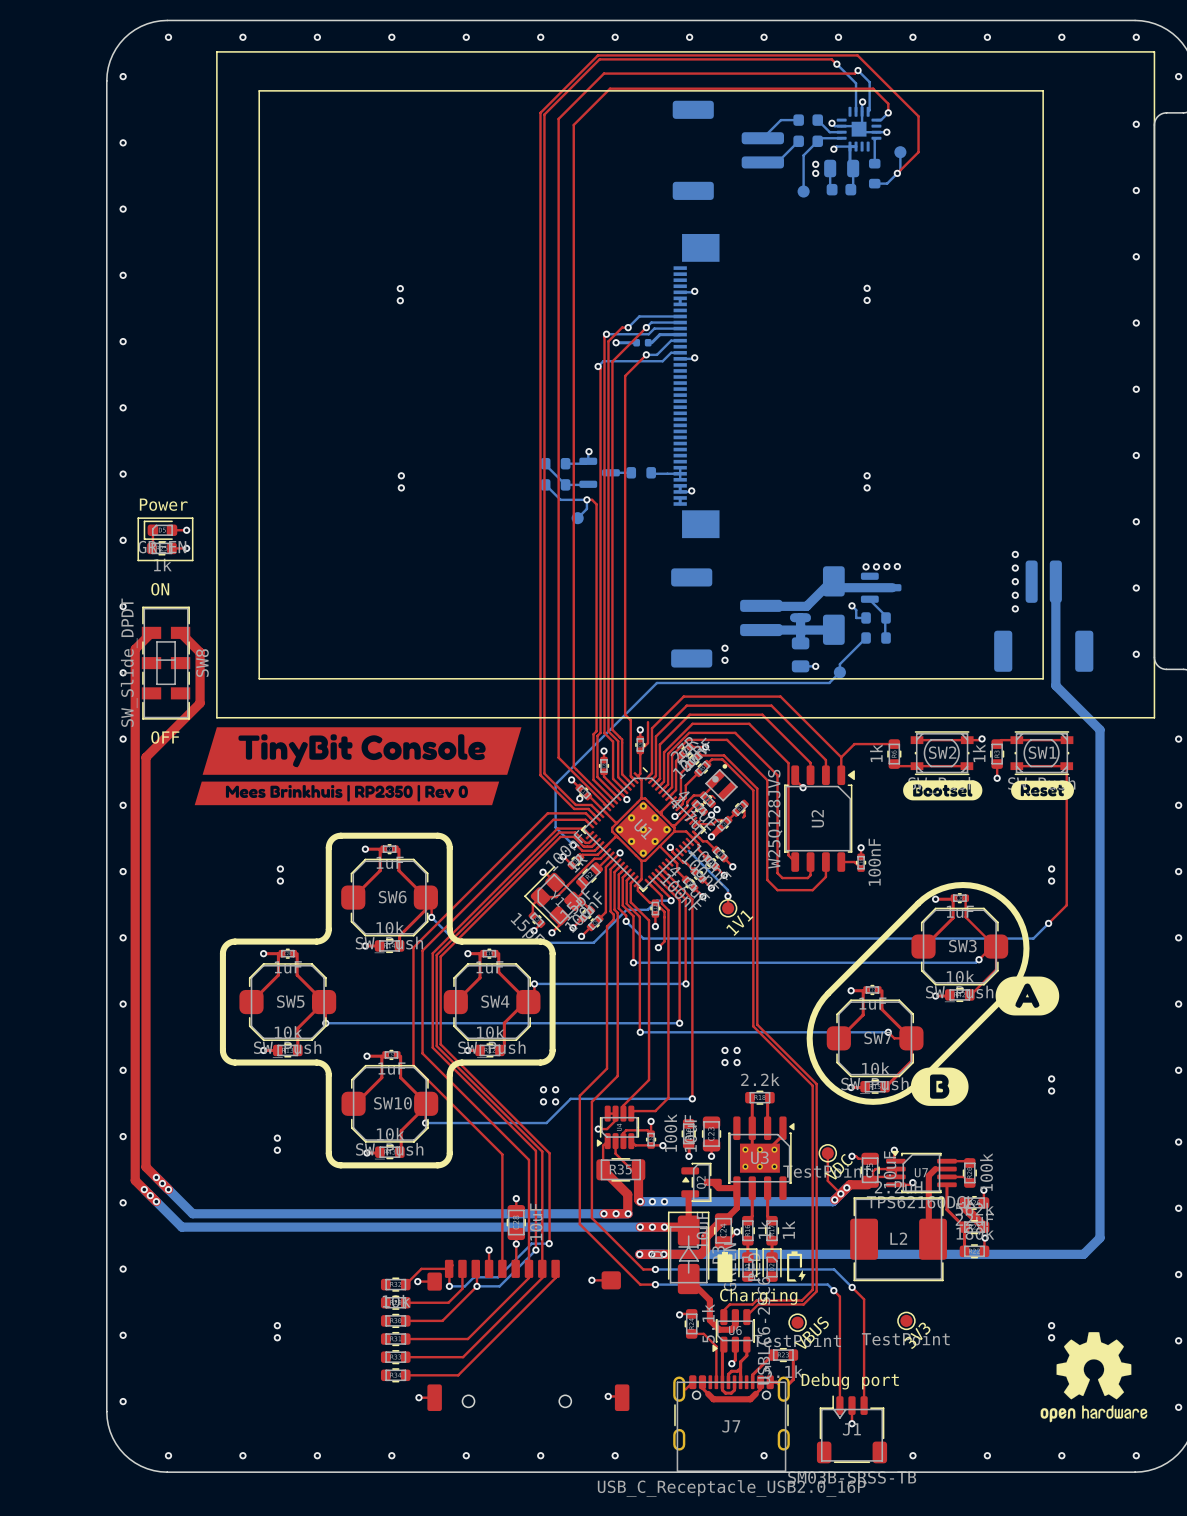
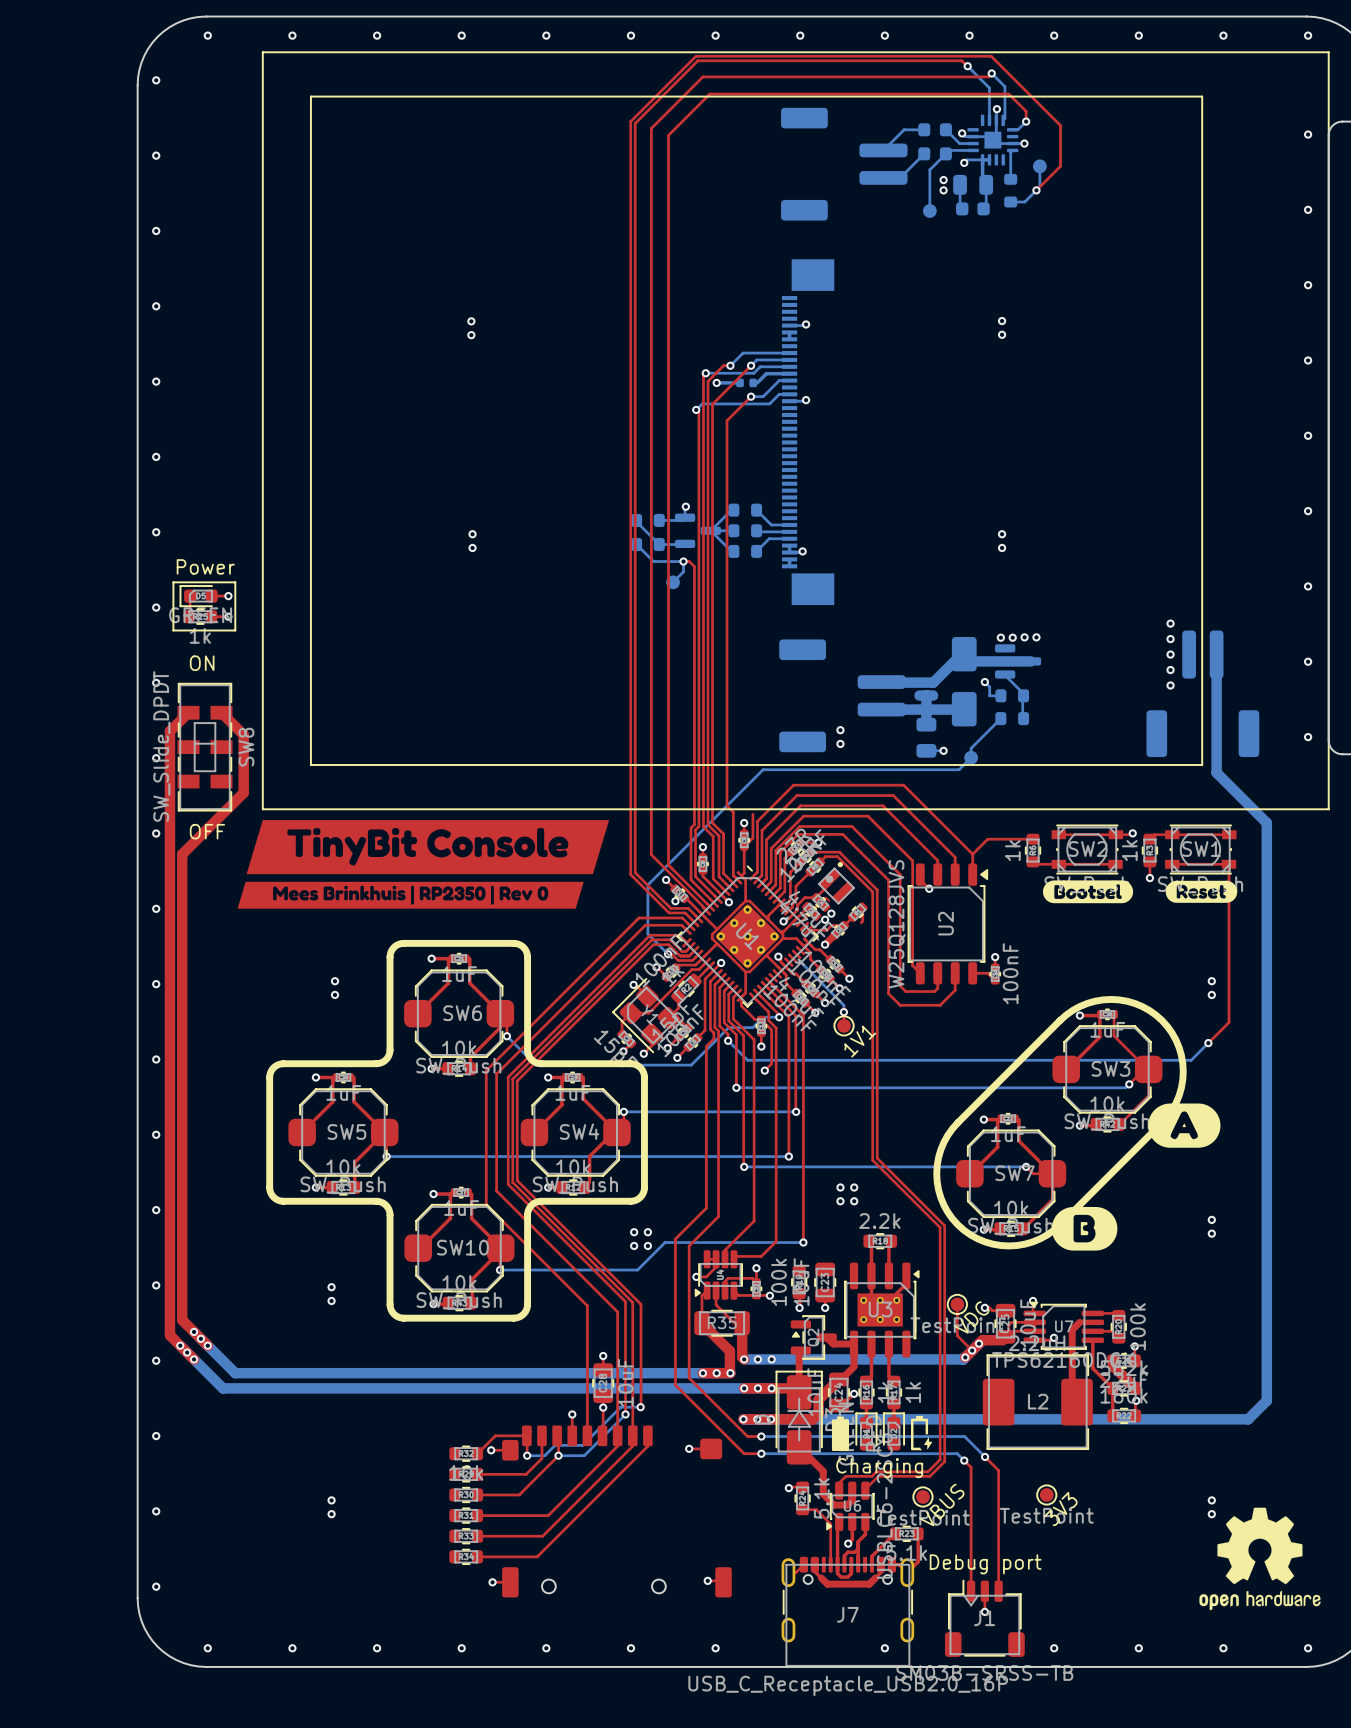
bottom track: none -> (733, 510) (731, 510) (710, 530) (731, 551) (733, 551)
part: none -> (745, 510)
bottom track: none -> (756, 510) (771, 524) (789, 524)
bottom track: (680, 467) (680, 479) -> (756, 551) (769, 538) (789, 538)
part: none -> (745, 551)

